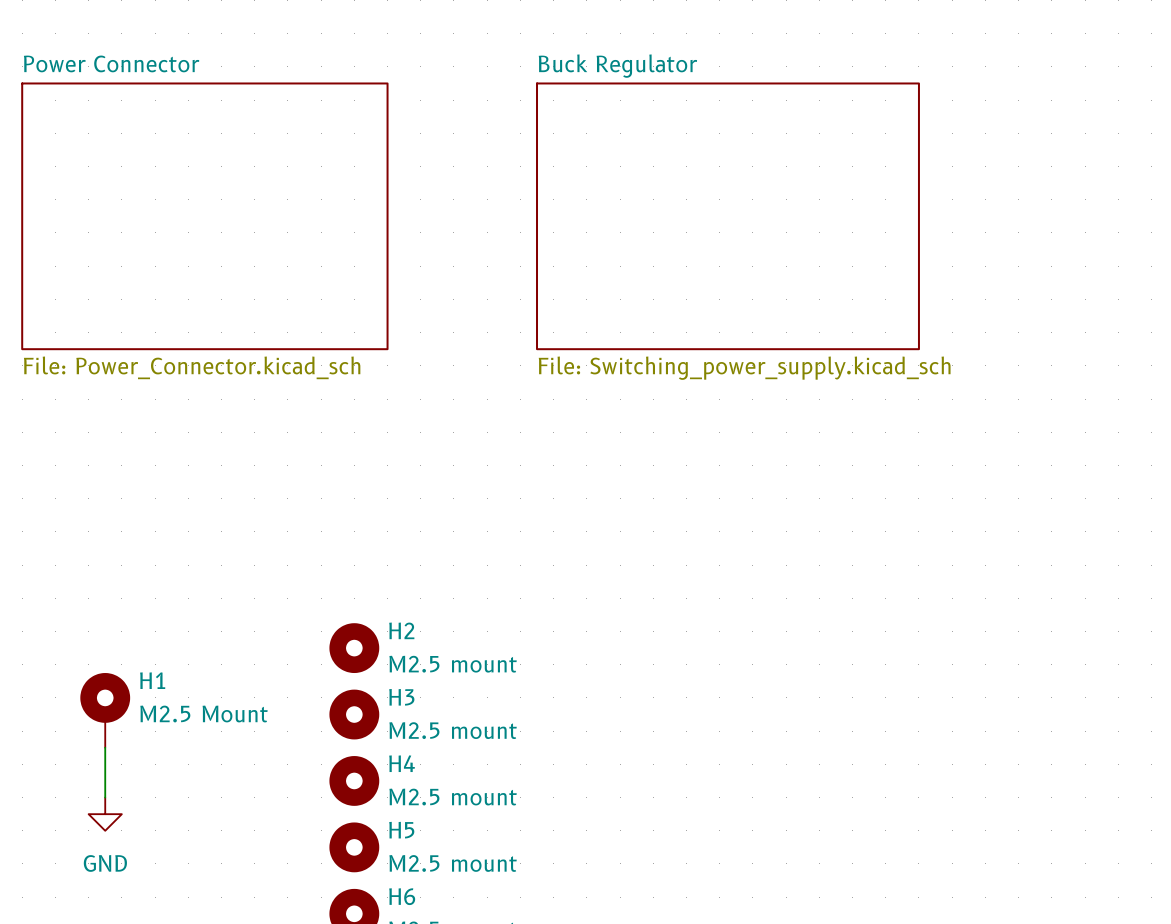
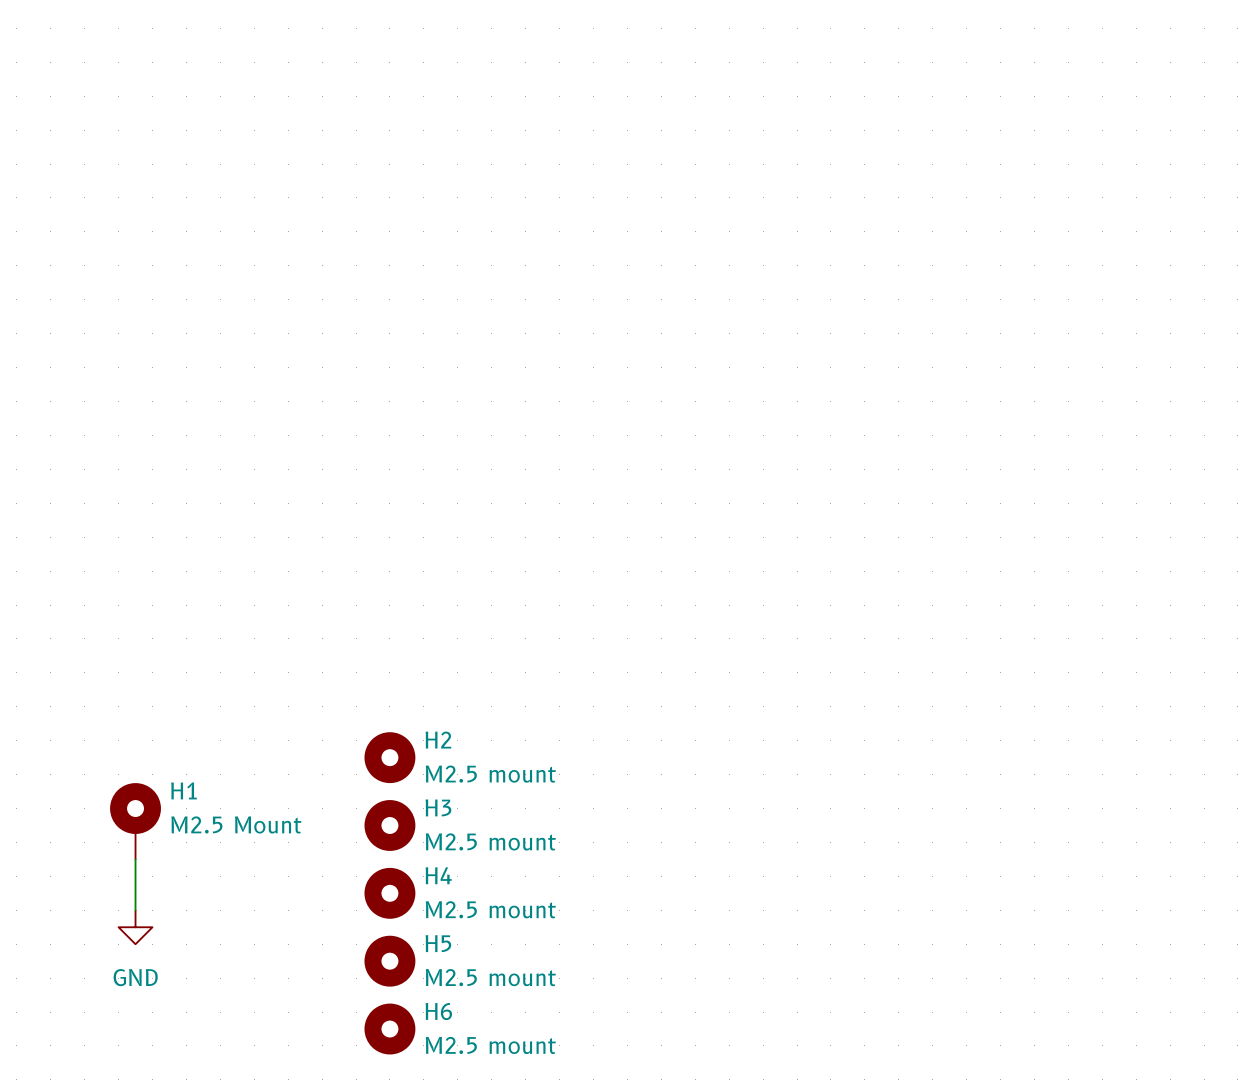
sheet Power Connector: File: Power_Connector.kicad_sch (204, 216) -> none
sheet Buck Regulator: File: Switching_power_supply.kicad_sch (727, 216) -> none

